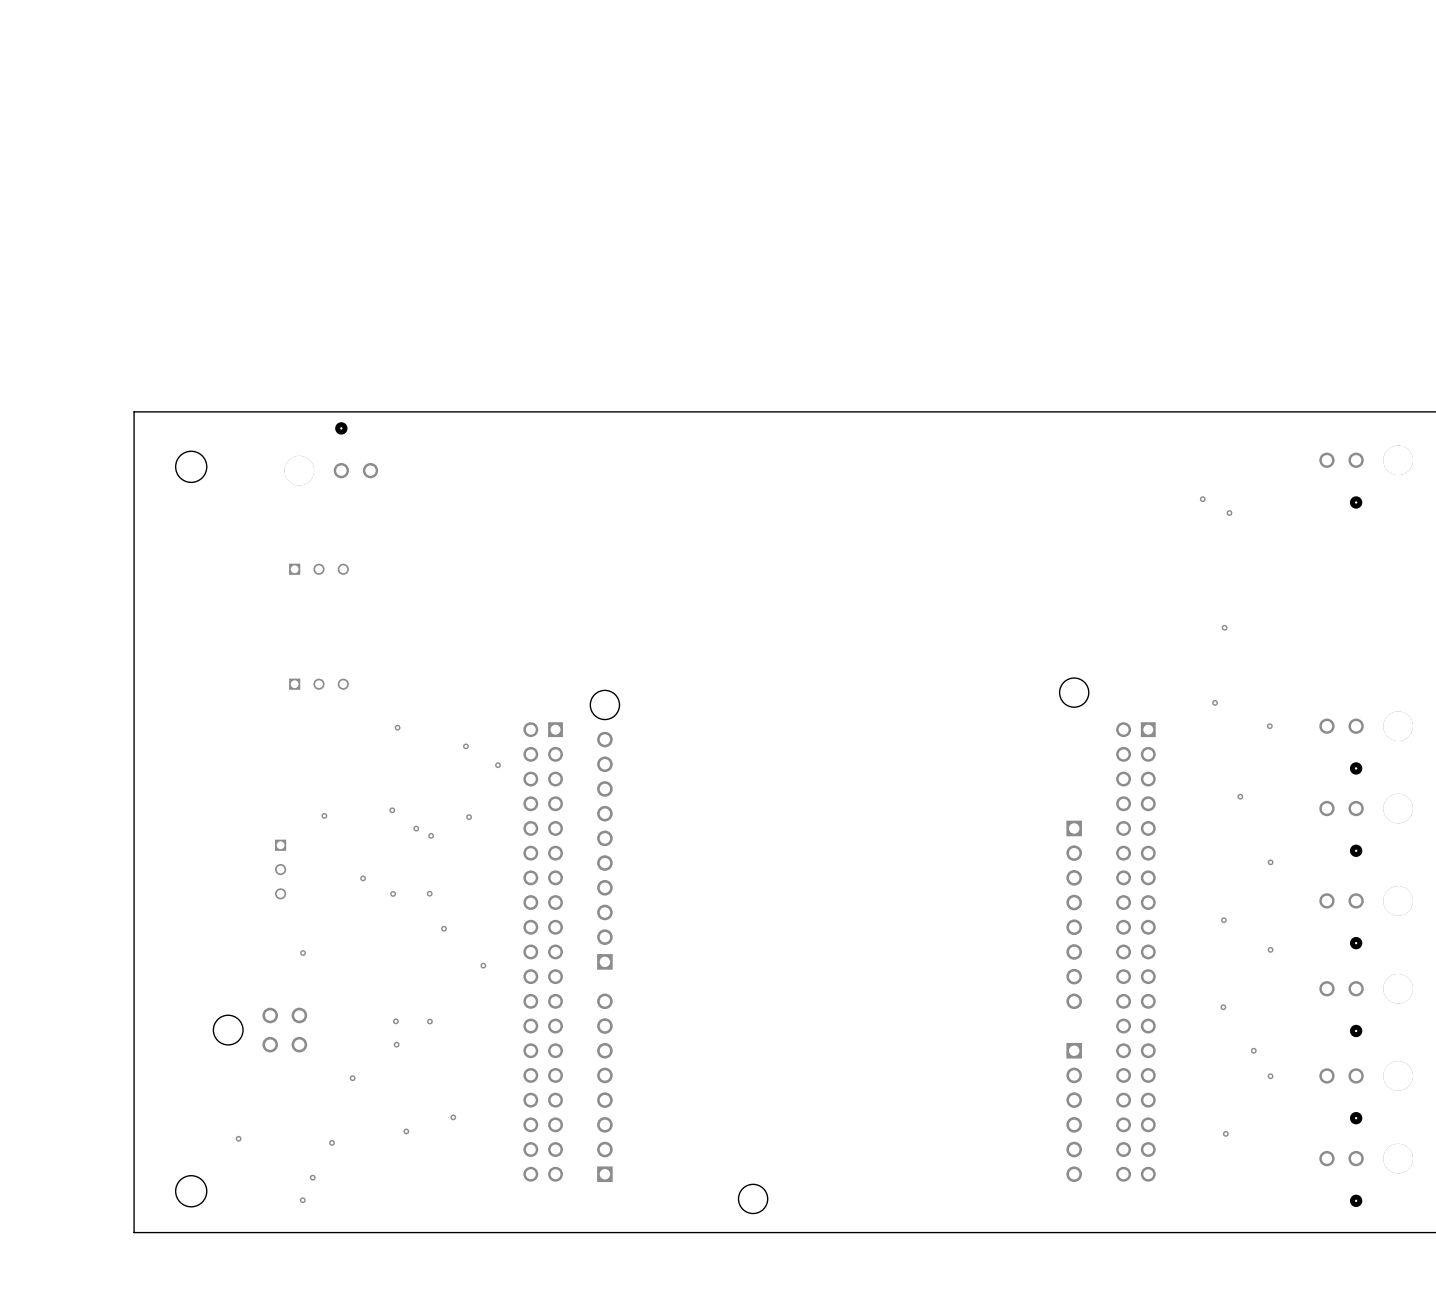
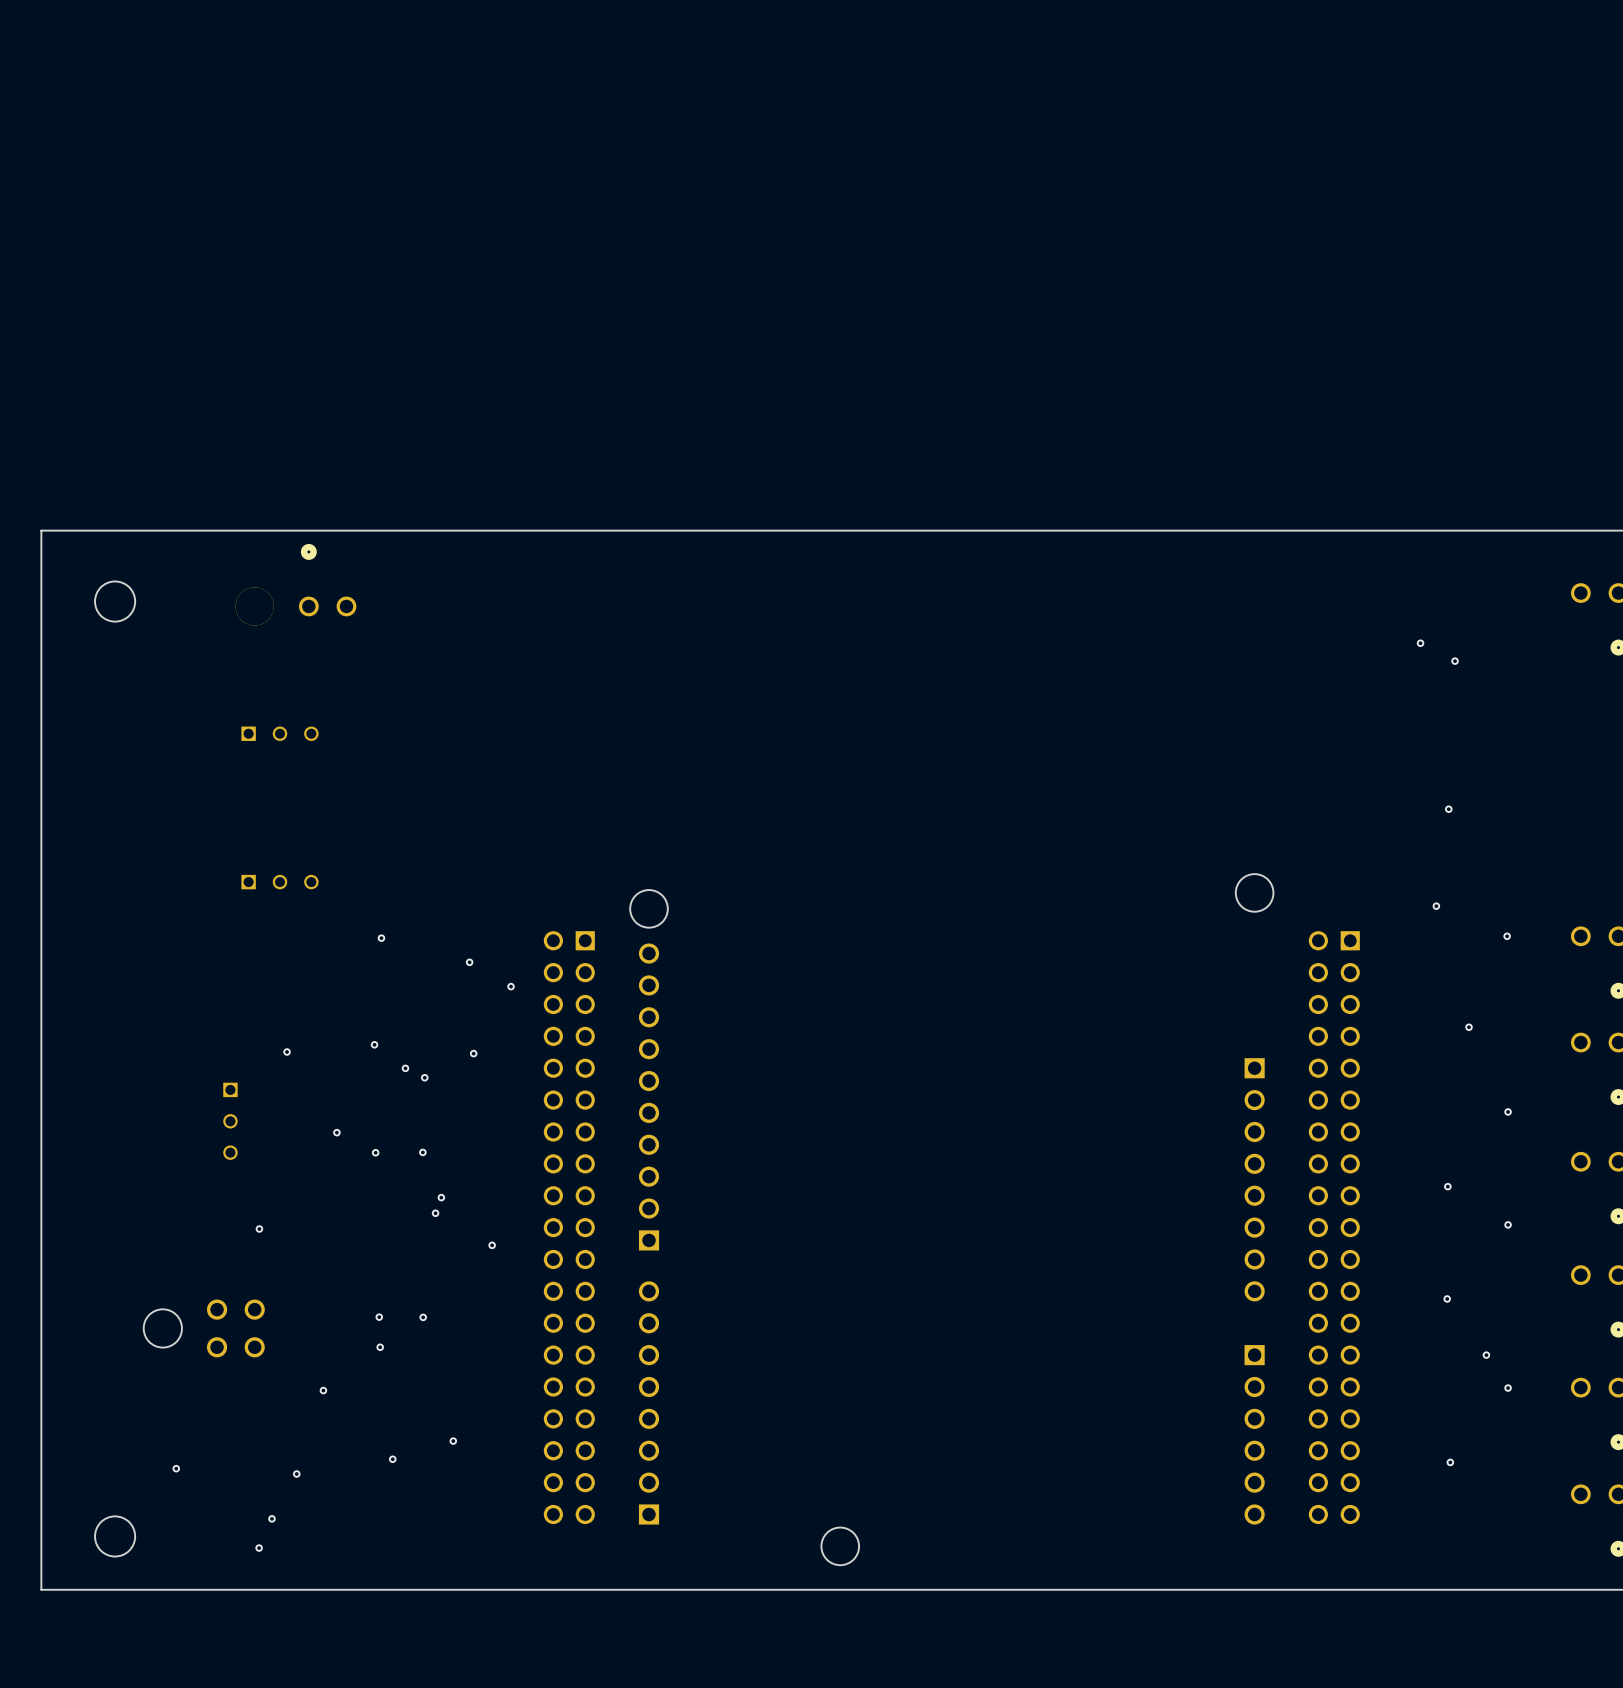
via: none -> (435, 1213)

